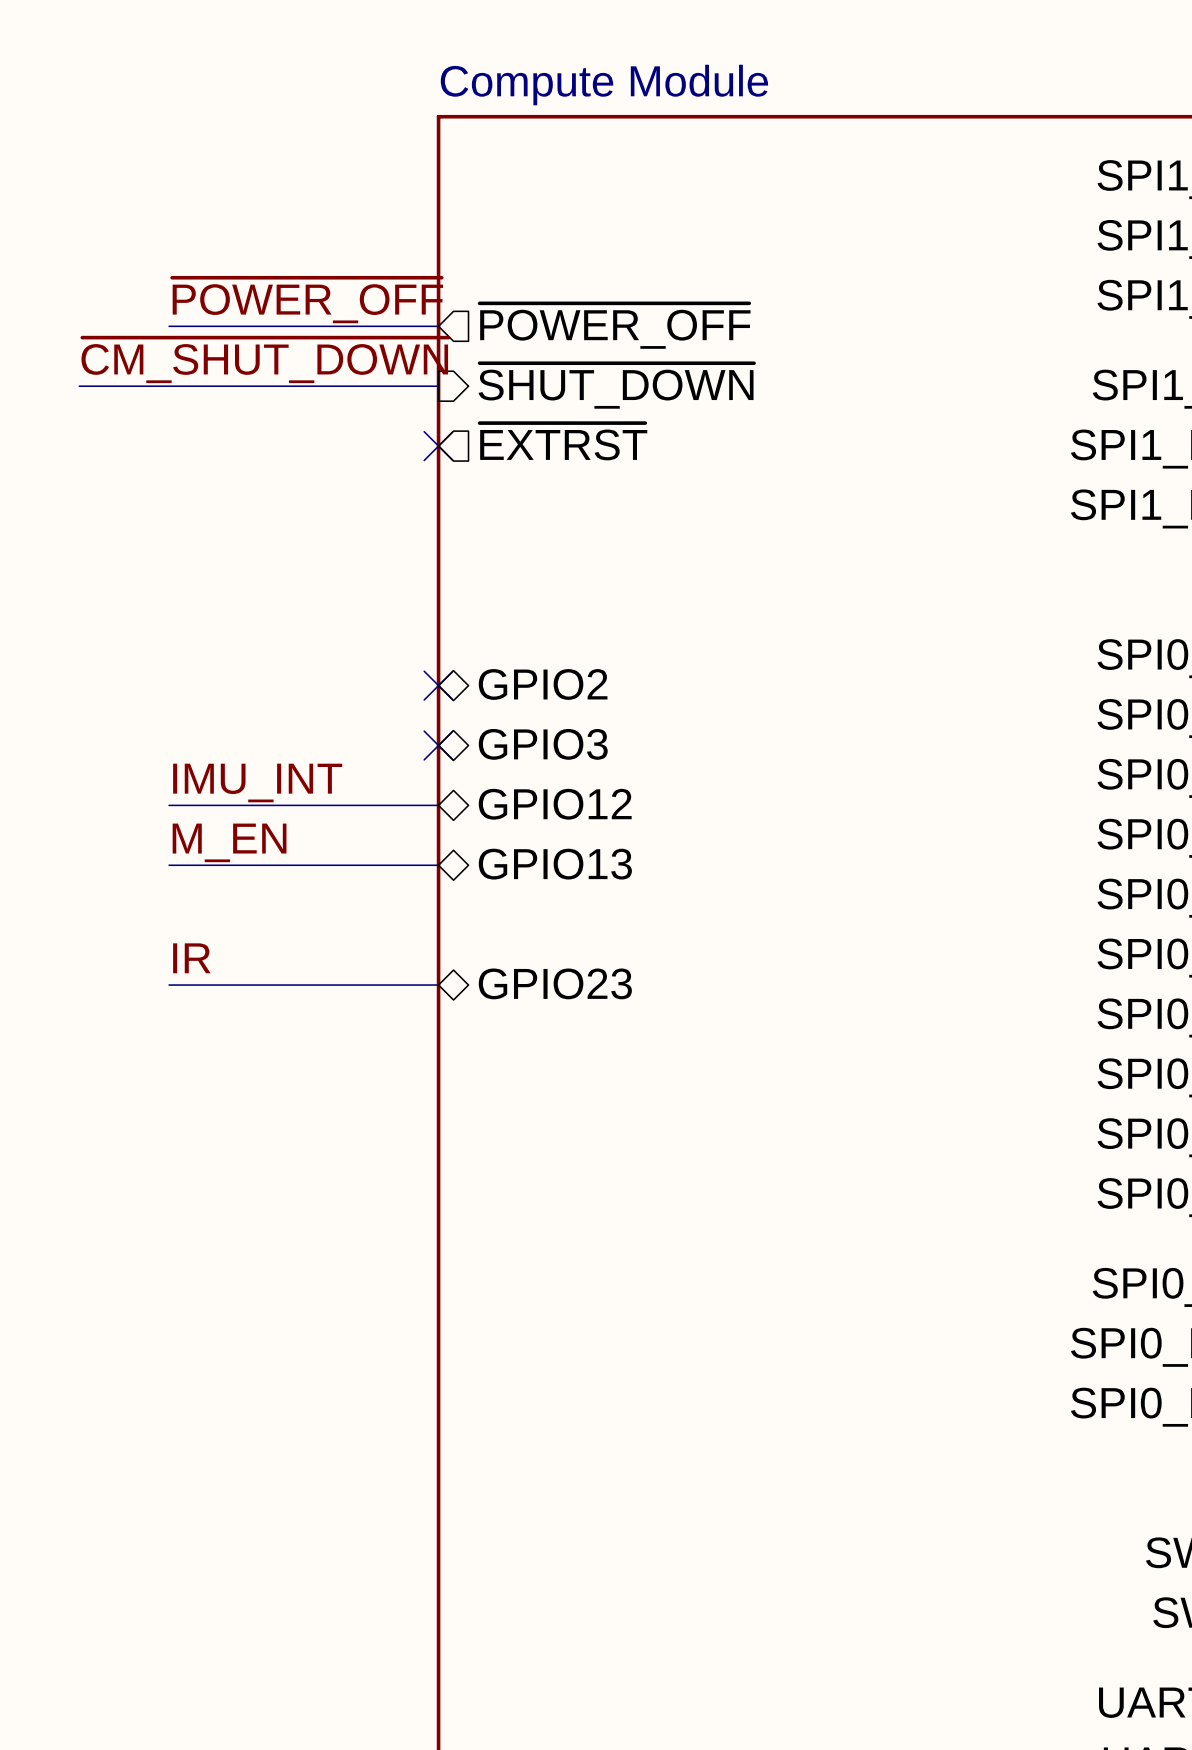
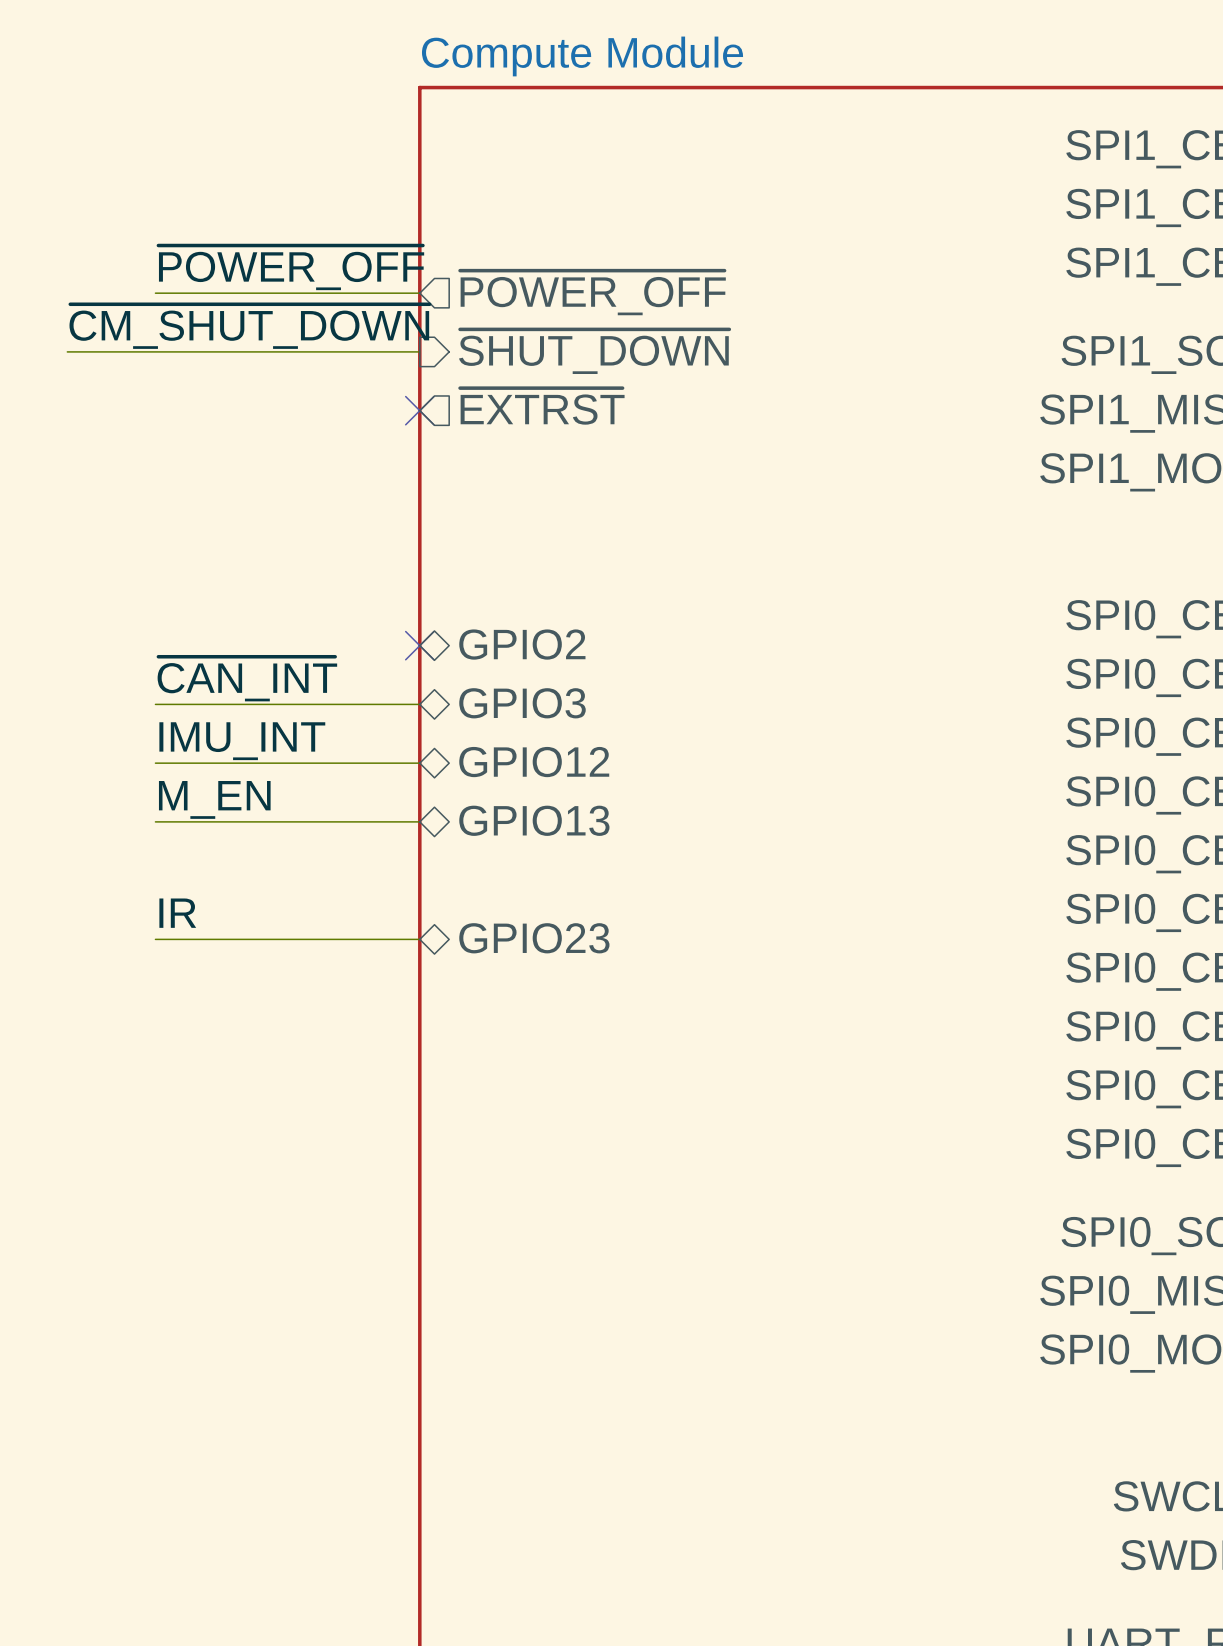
label: none -> ~{CAN_INT} (247, 679)
wire: none -> (155, 704) (419, 704)
no-connect mark: (438, 745) -> none

